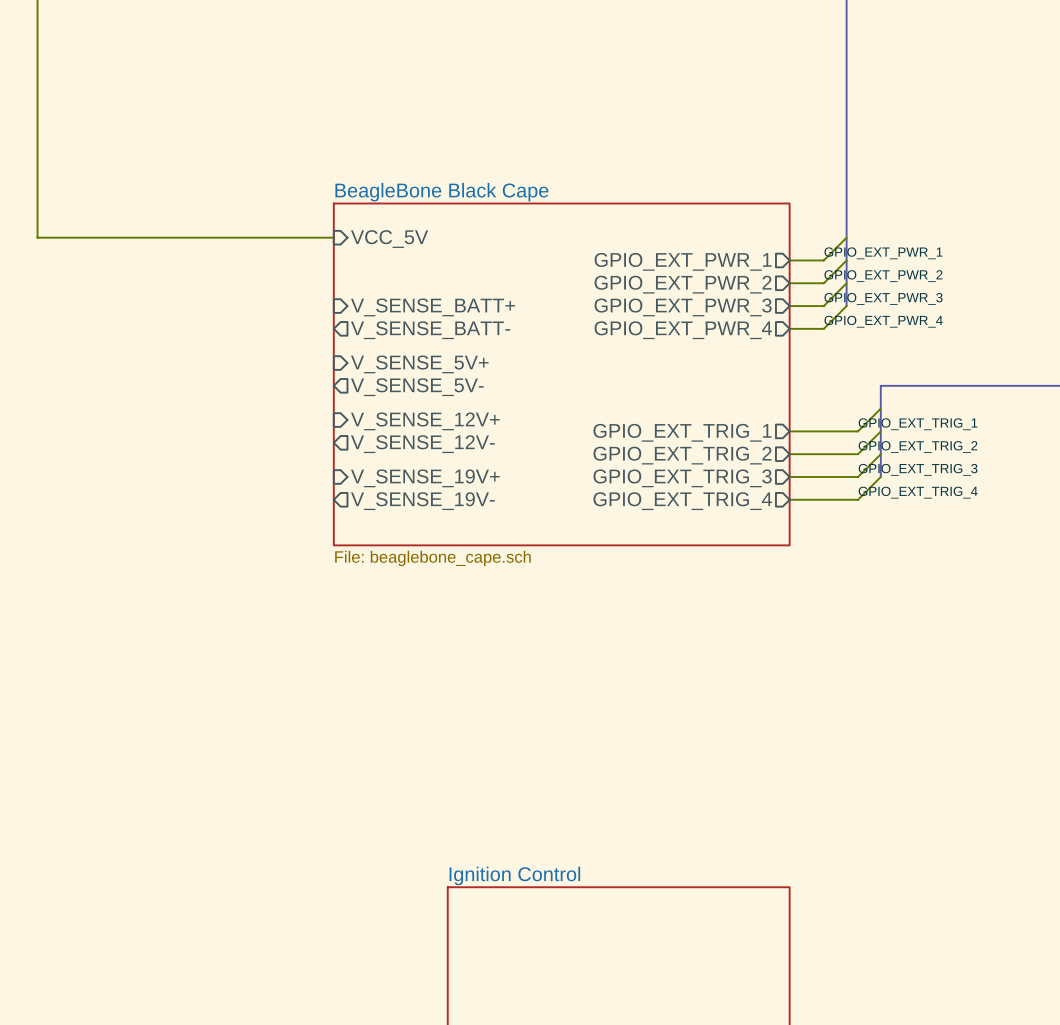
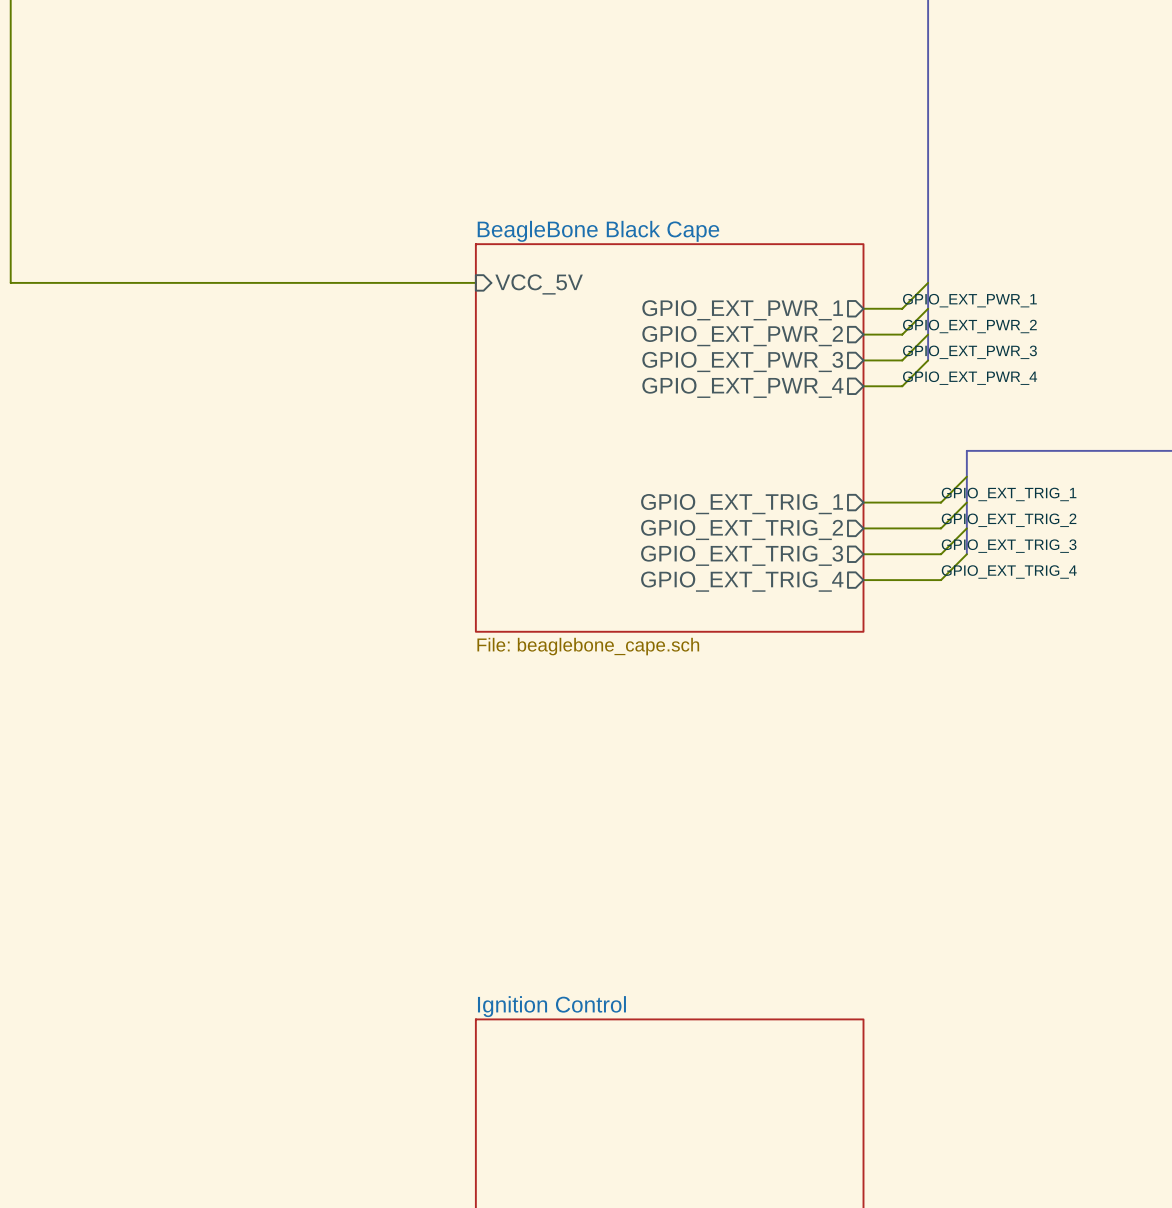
wire: none -> (346, 282) (475, 282)
sheet pin position: VCC_5V (389, 239) -> VCC_5V (539, 284)
sheet pin: V_SENSE_BATT+ (433, 307) -> none
sheet pin: V_SENSE_BATT- (430, 330) -> none
sheet pin: V_SENSE_5V+ (419, 364) -> none
sheet BeagleBone Black Cape: File: beaglebone_cape.sch (561, 374) -> none
sheet BeagleBone Black Cape: none -> File: beaglebone_cape.sch (669, 437)
sheet pin: V_SENSE_5V- (417, 387) -> none
sheet pin: V_SENSE_12V+ (425, 421) -> none
sheet pin: V_SENSE_12V- (422, 444) -> none
sheet pin: V_SENSE_19V+ (425, 478) -> none
sheet pin: V_SENSE_19V- (422, 501) -> none

